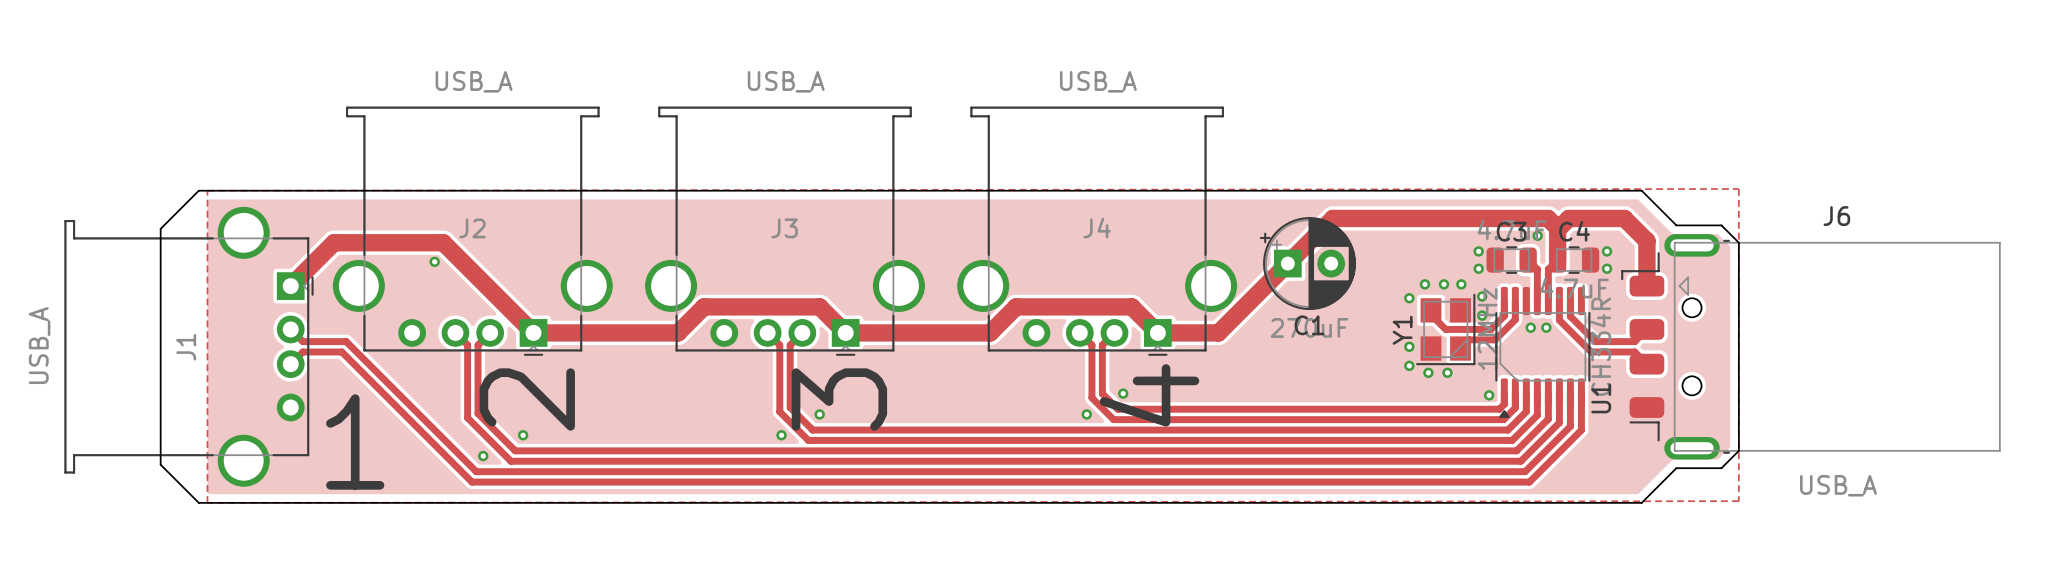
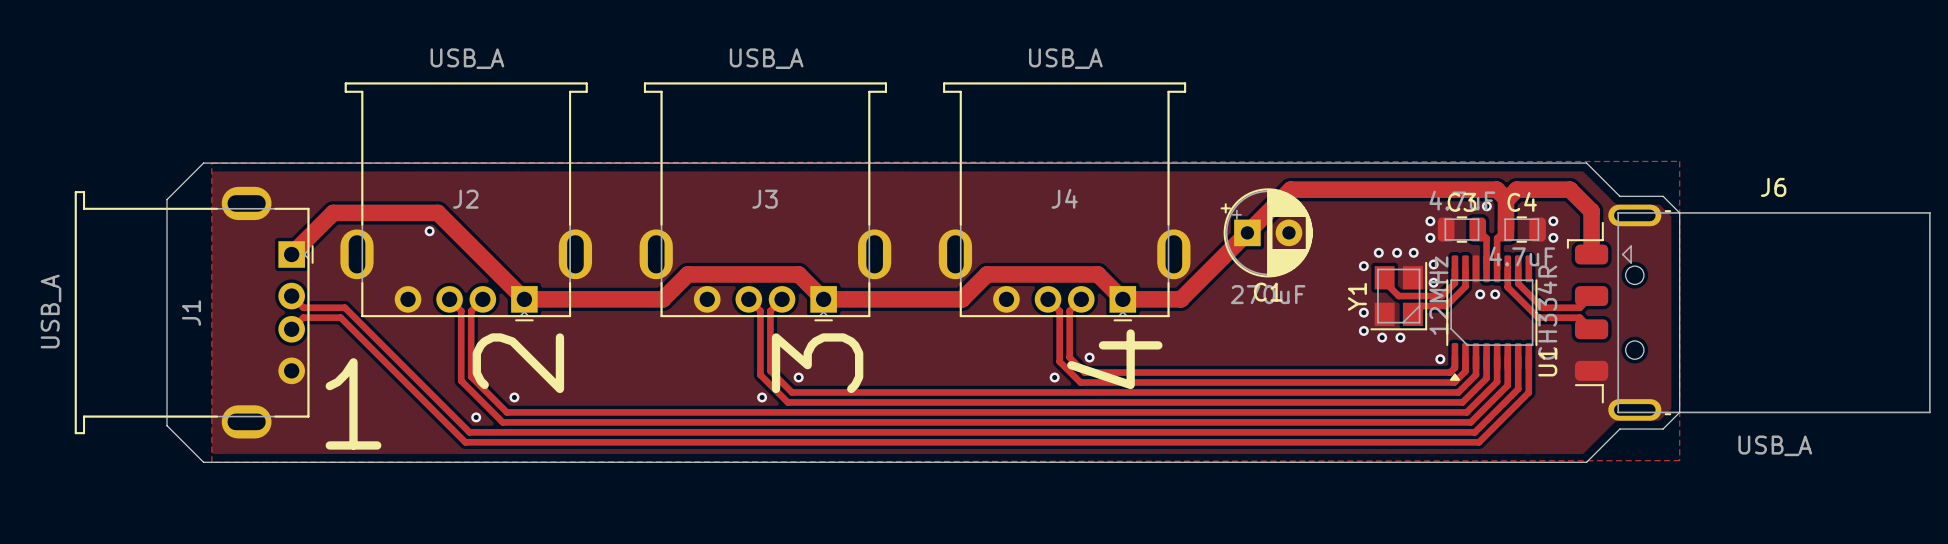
J2 footprint: [332, 106, 613, 356] -> [340, 82, 593, 322]
J3 footprint: [645, 106, 925, 356] -> [639, 82, 892, 322]
J4 footprint: [957, 106, 1238, 356] -> [938, 82, 1191, 322]
J1 footprint: [64, 206, 314, 487] -> [74, 186, 314, 439]

